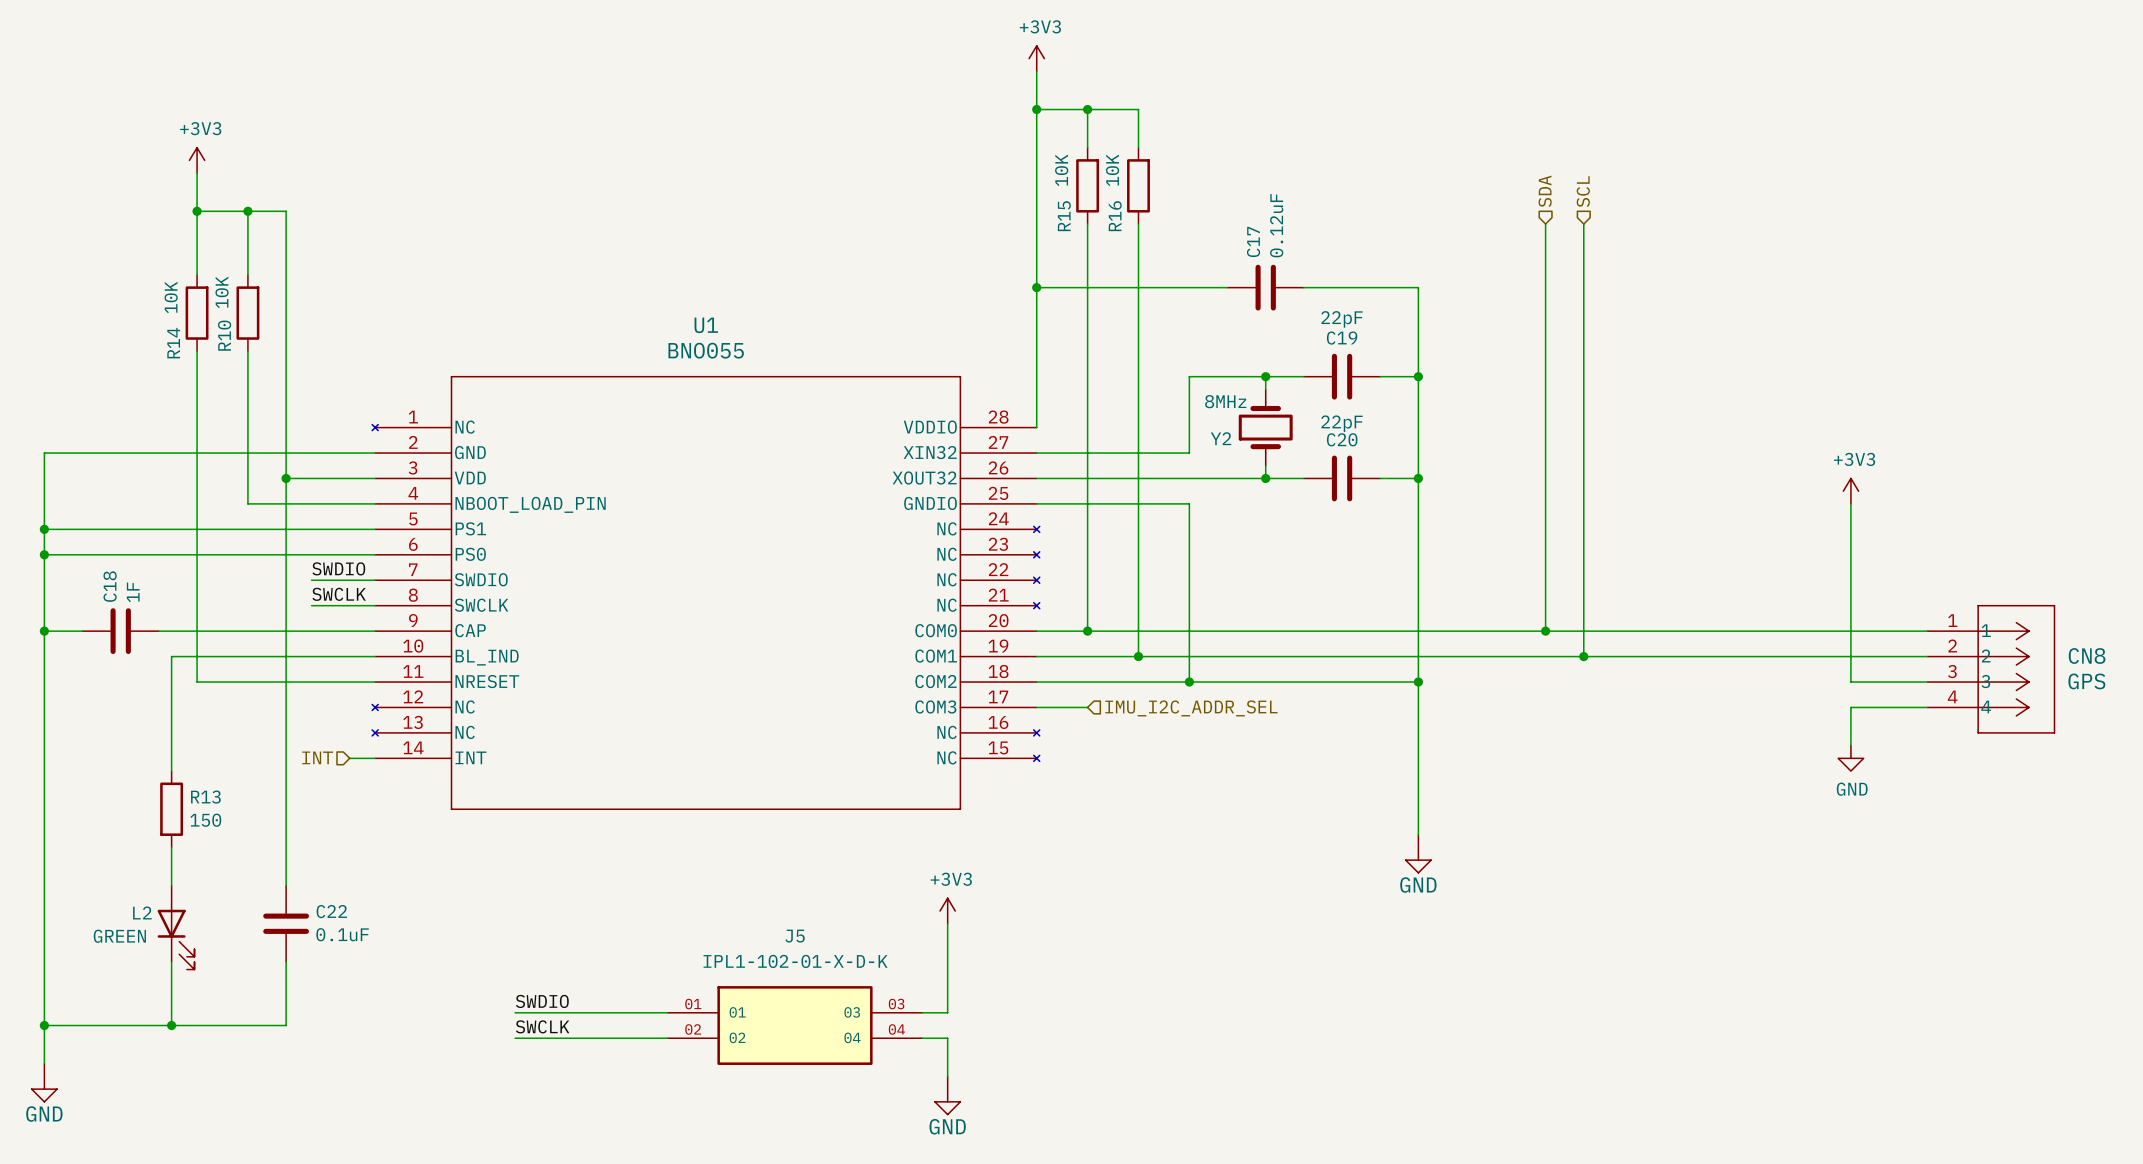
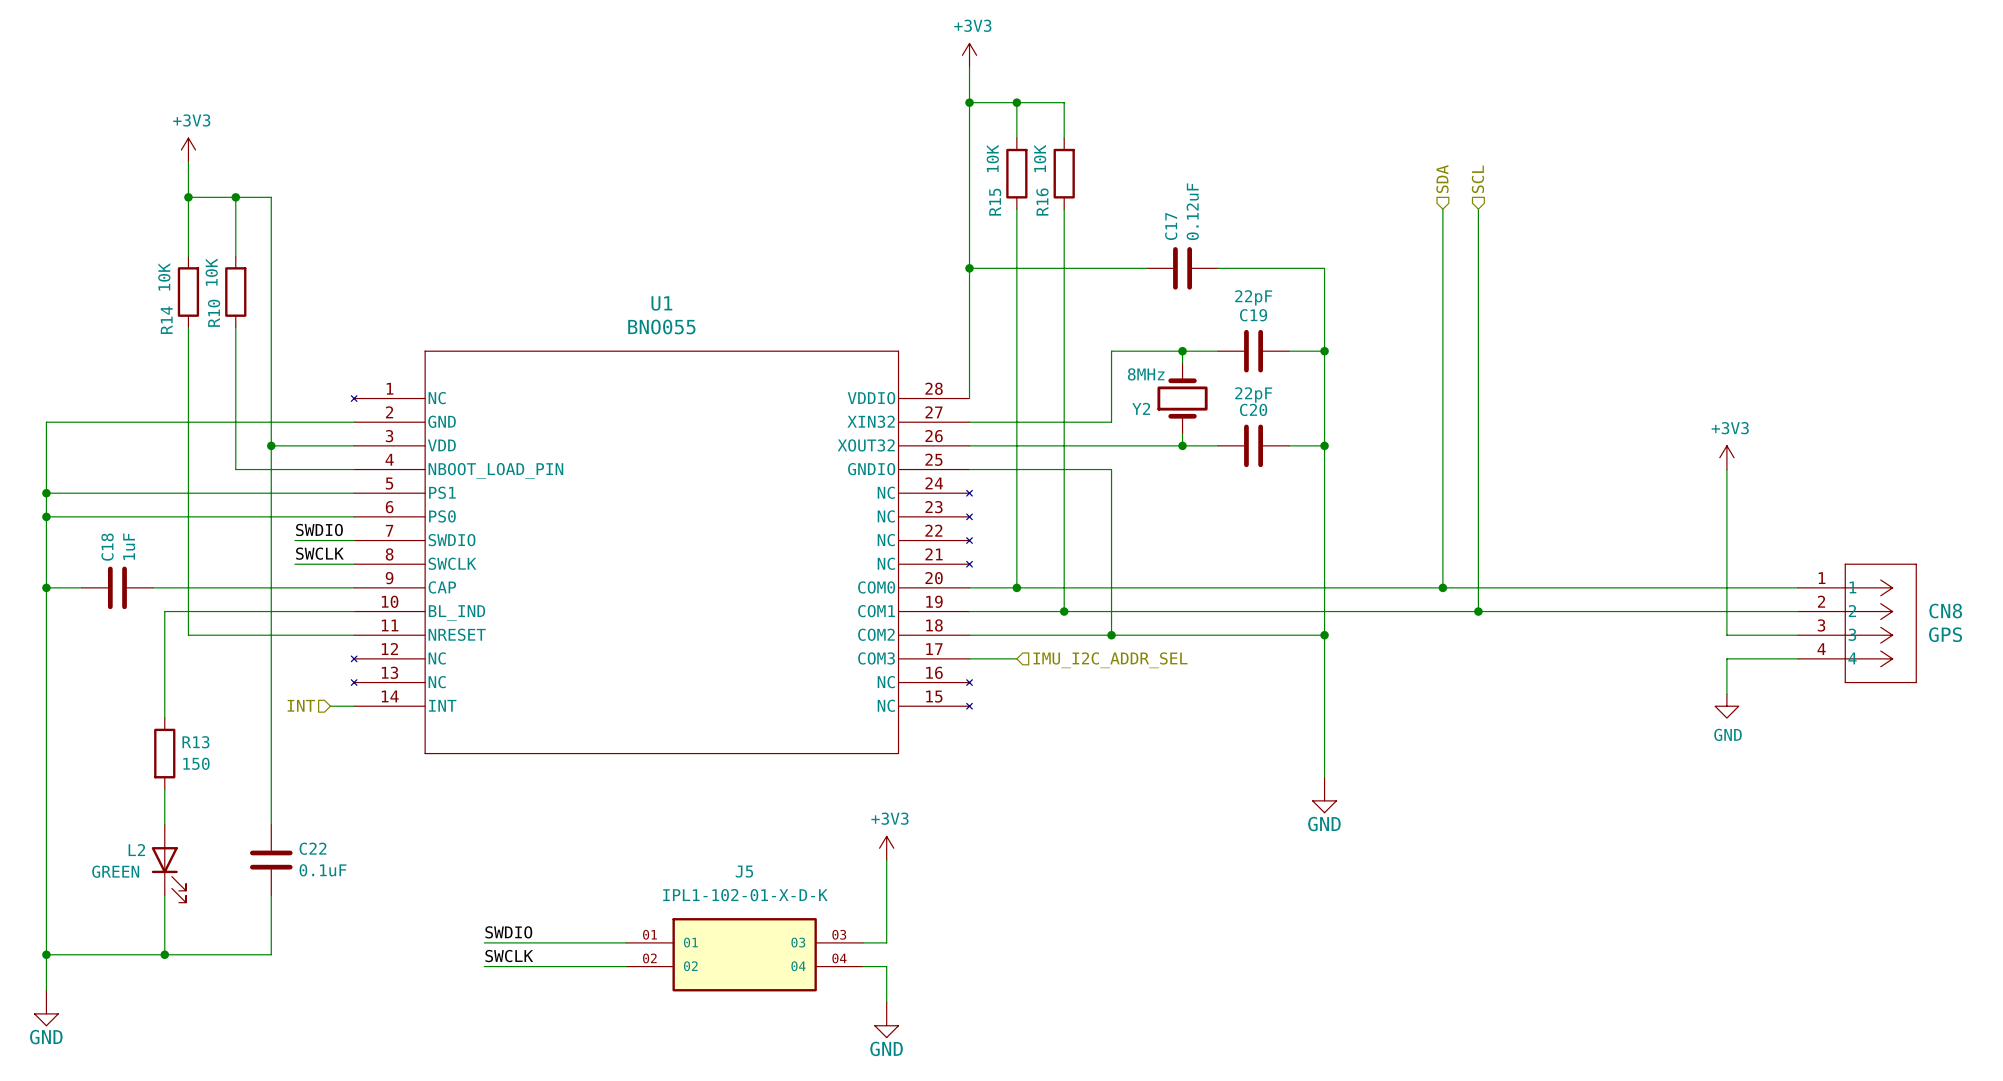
C18 value: 1F (133, 592) -> 1uF (129, 546)

